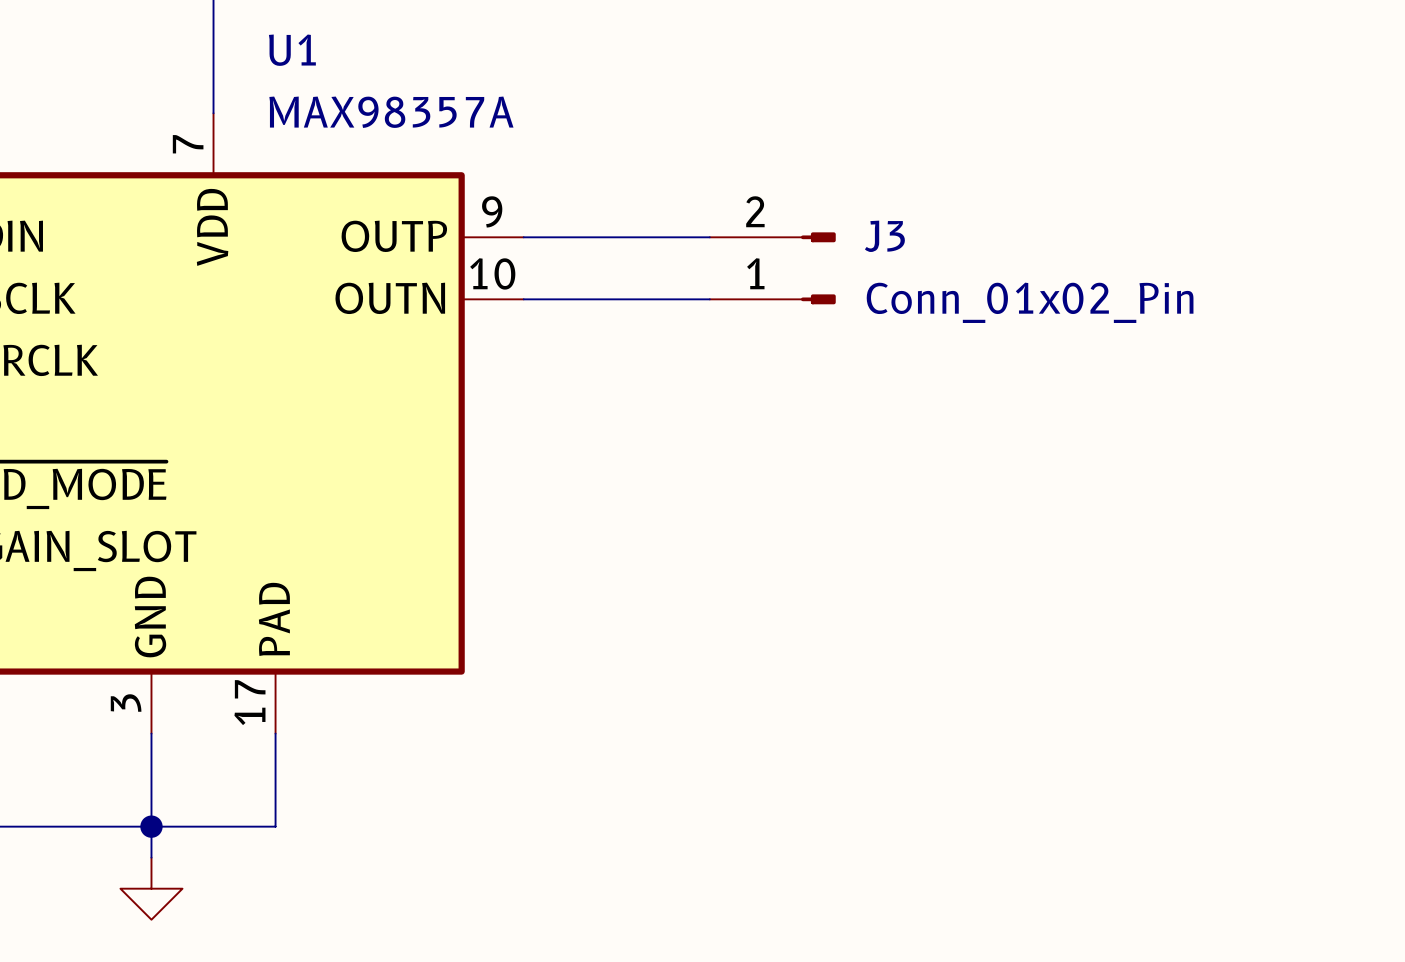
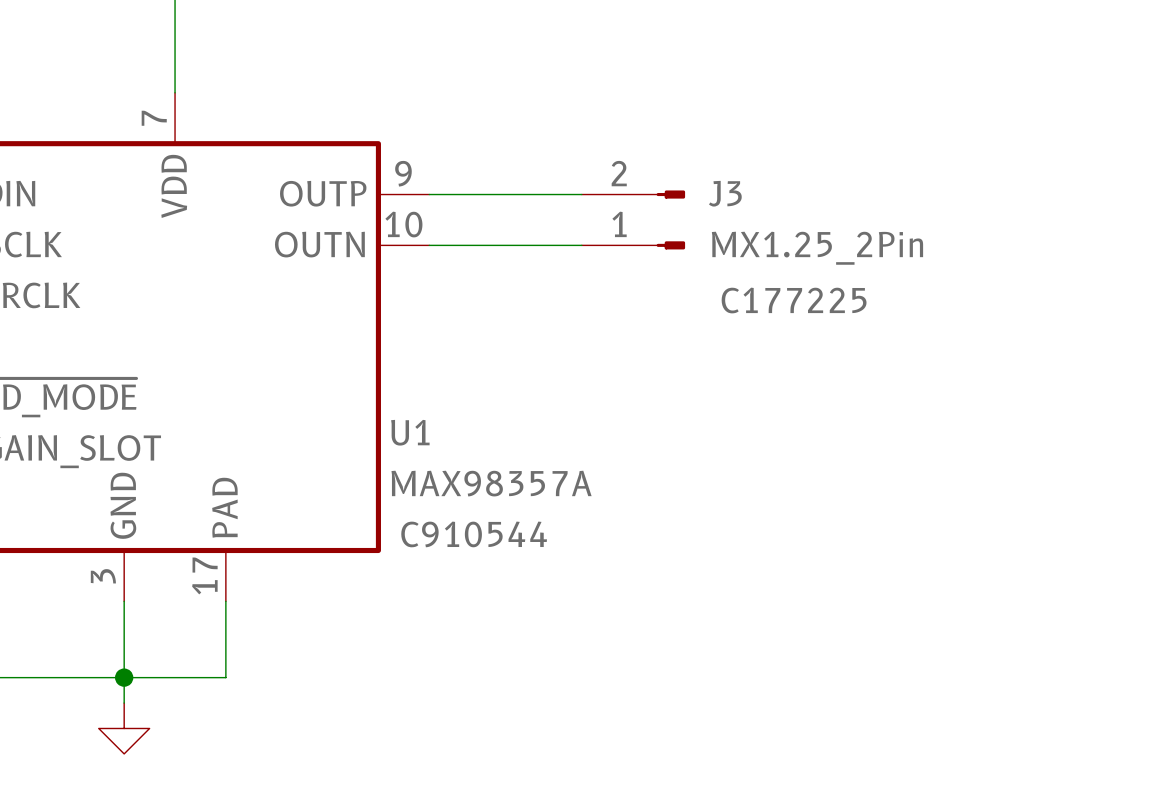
U1 name position: U1 (292, 50) -> U1 (410, 432)
U1 value position: MAX98357A (391, 112) -> MAX98357A (491, 483)
J3 value: Conn_01x02_Pin (1030, 302) -> MX1.25_2Pin (817, 248)
J3 text: none -> C177225 (794, 300)
U1 text: none -> C910544 (474, 534)

